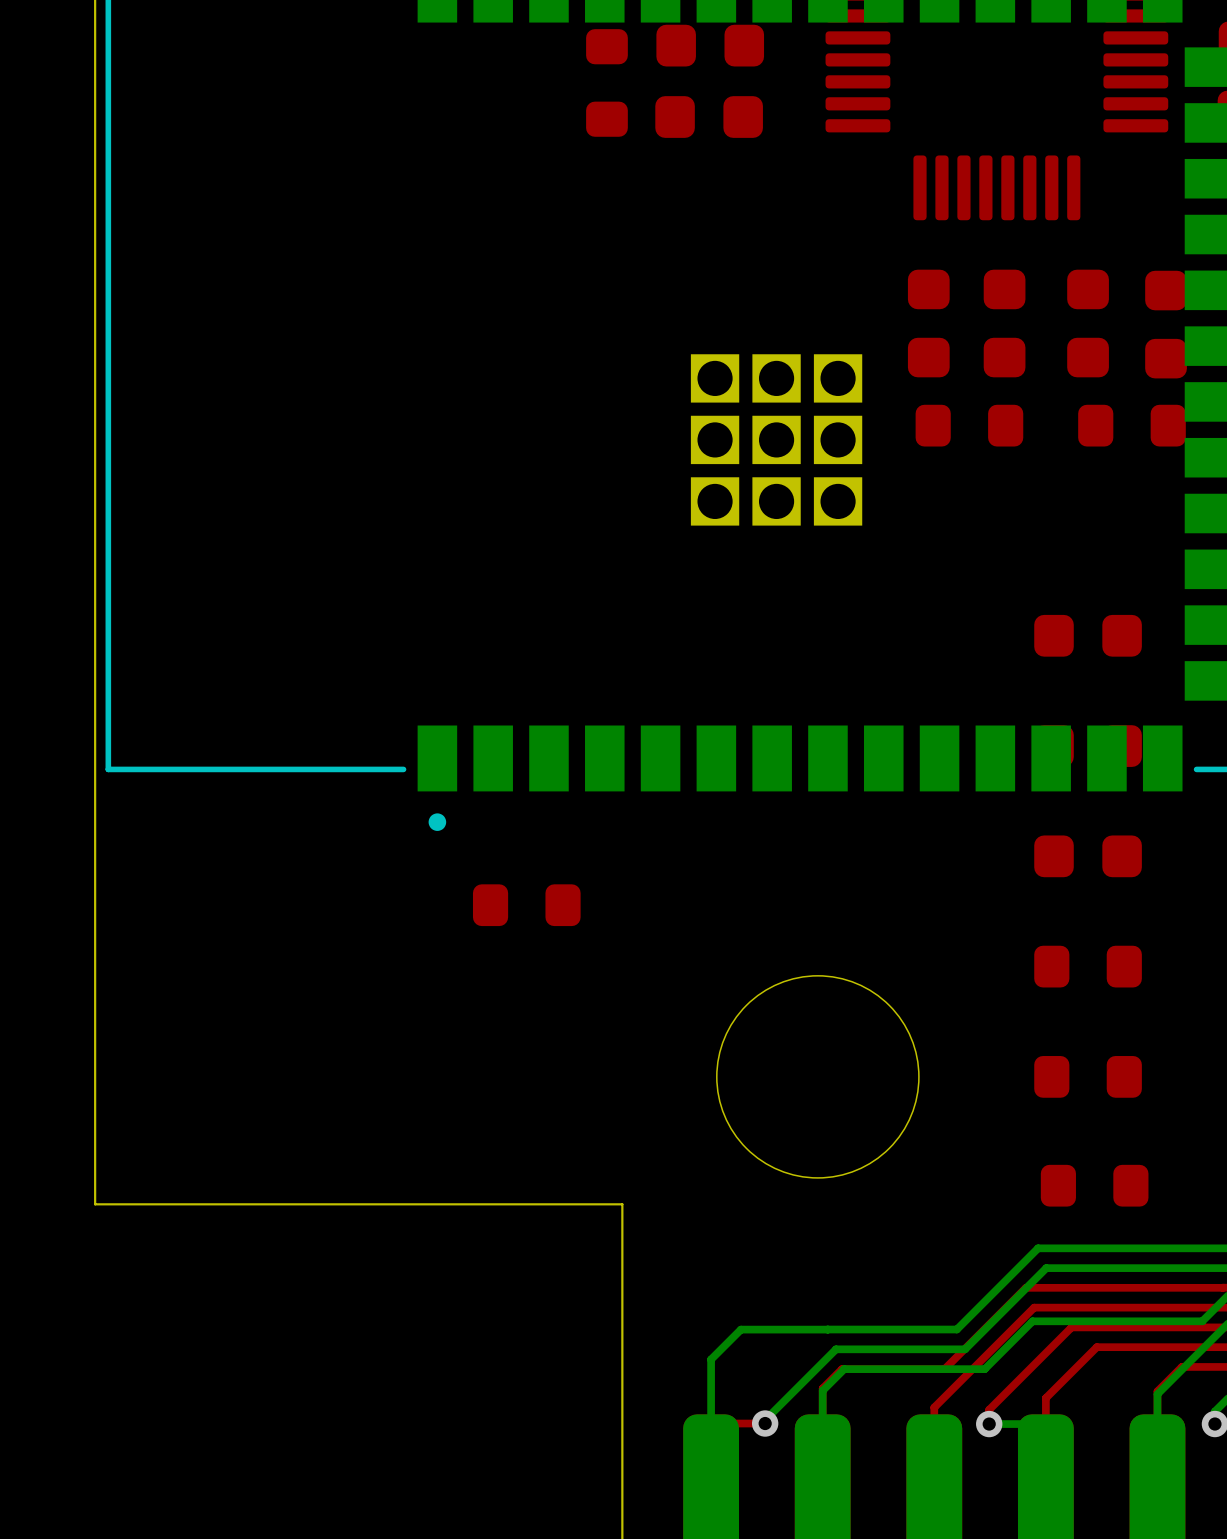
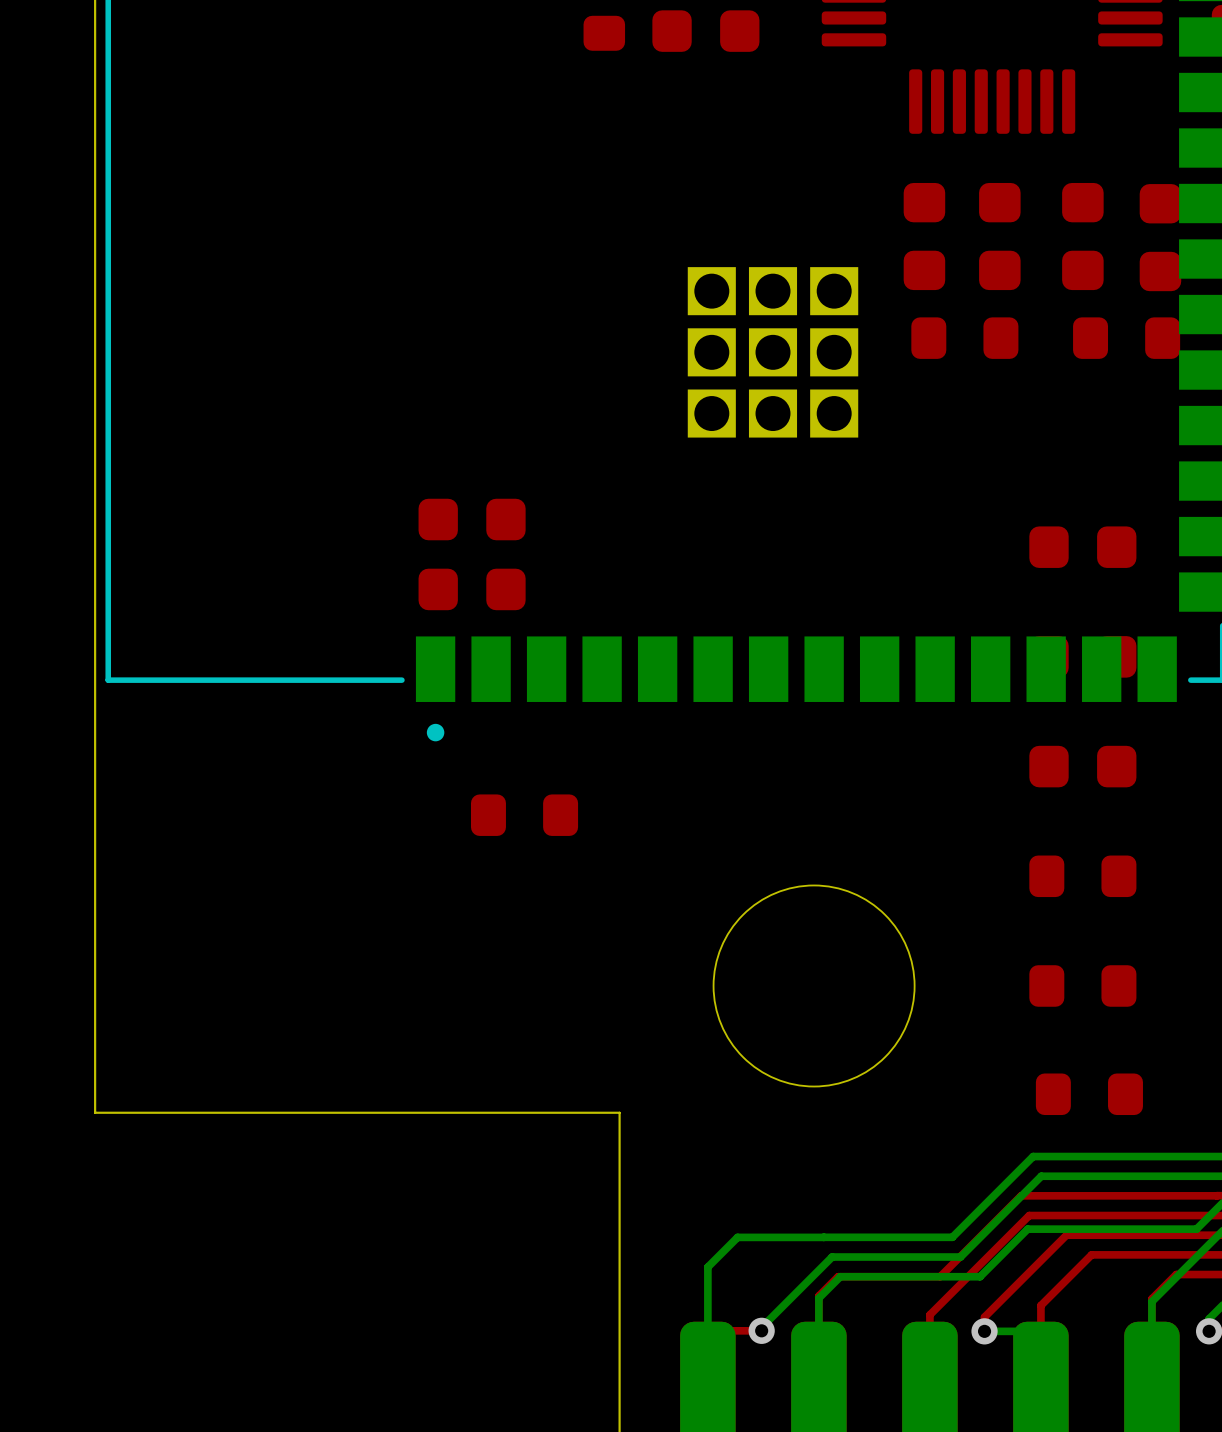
part: none -> (472, 519)
part: none -> (472, 589)

